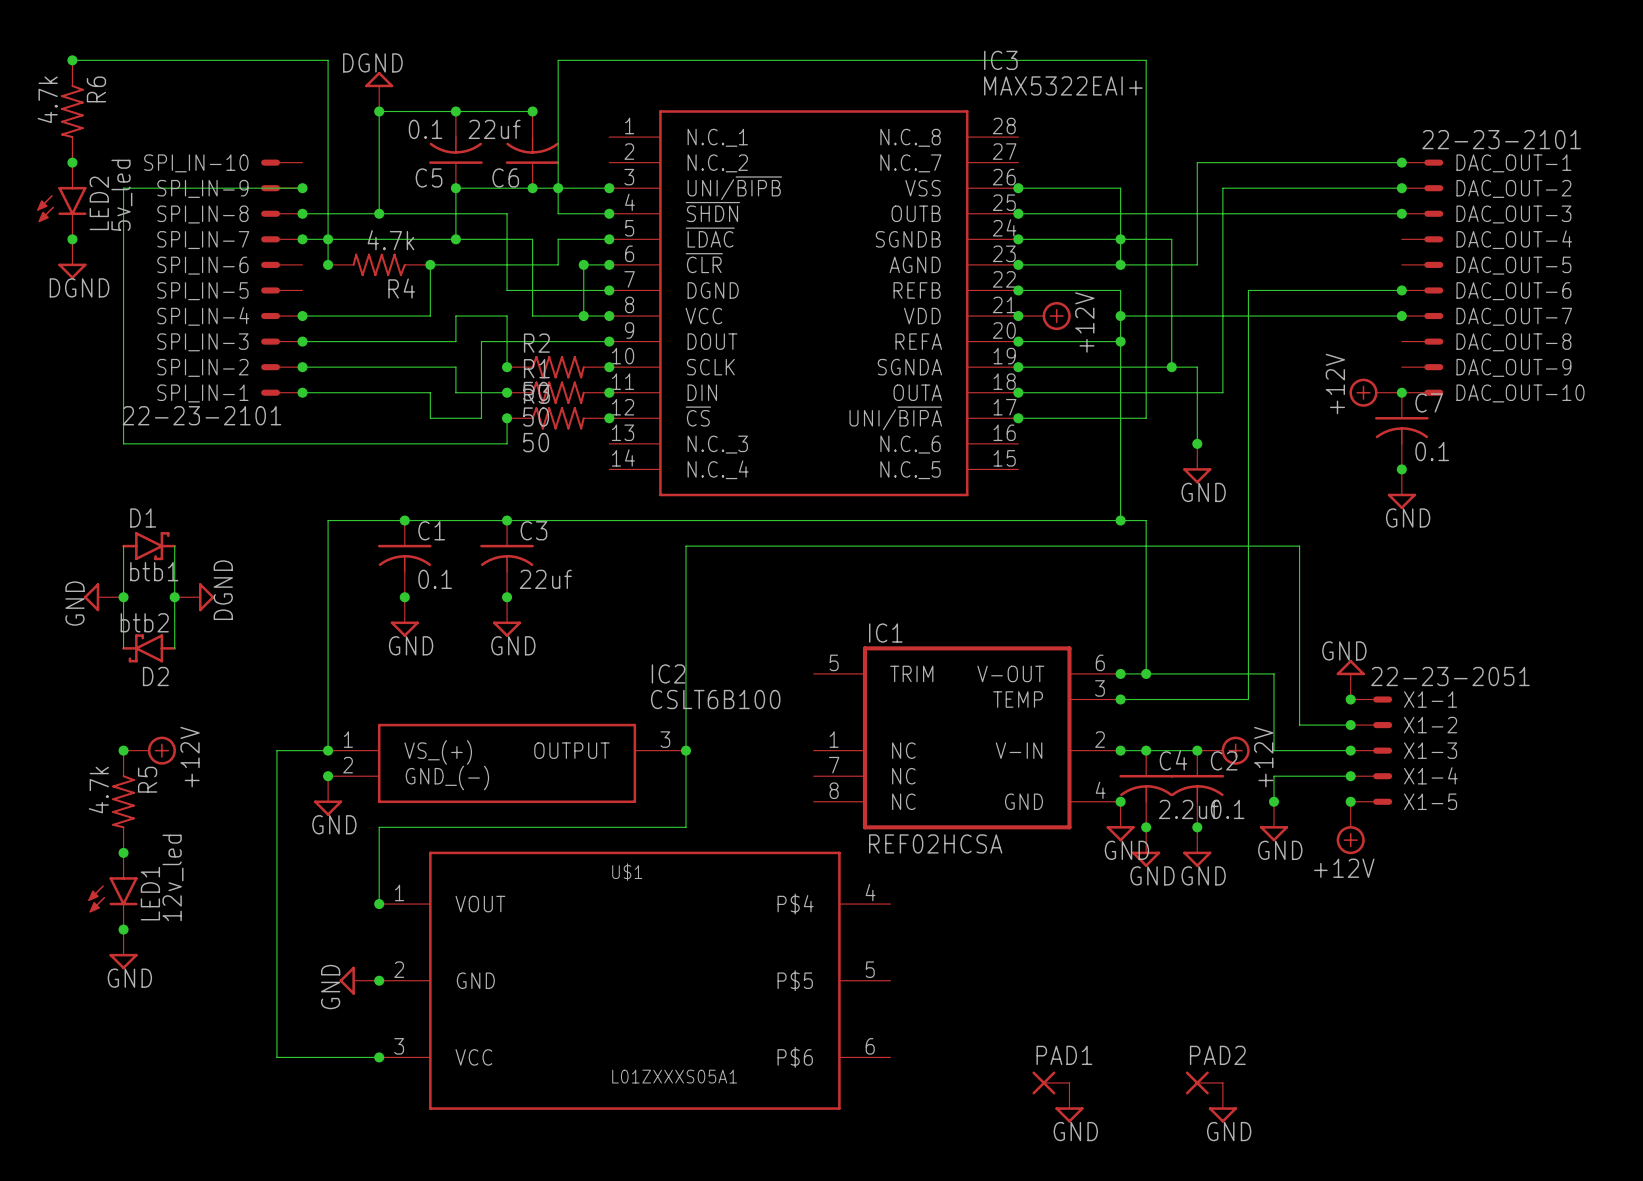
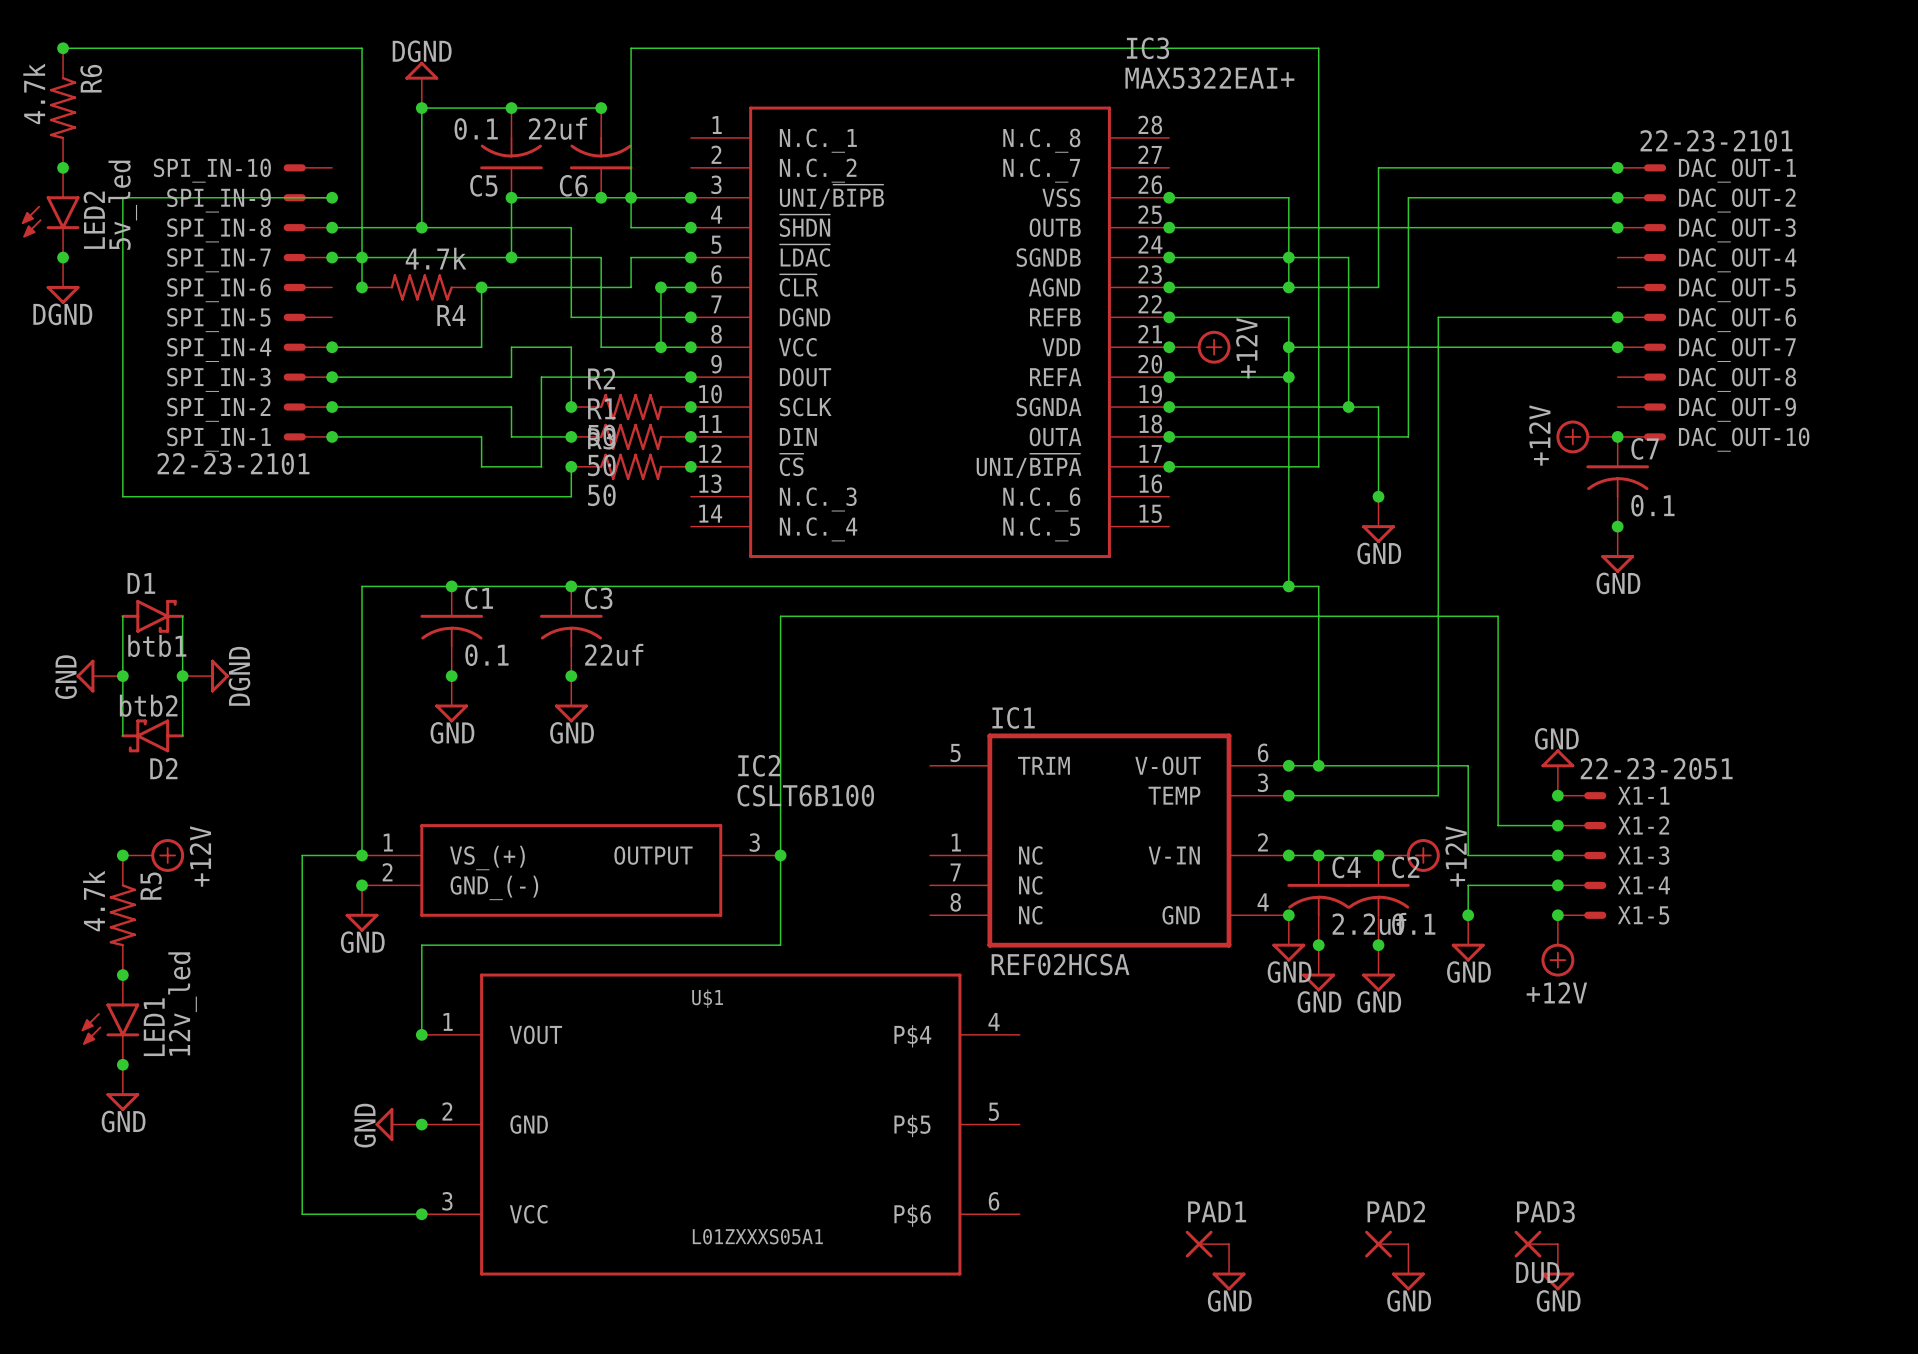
PAD3: none -> DUD (1536, 1244)
power symbol: none -> GND (1557, 1267)

